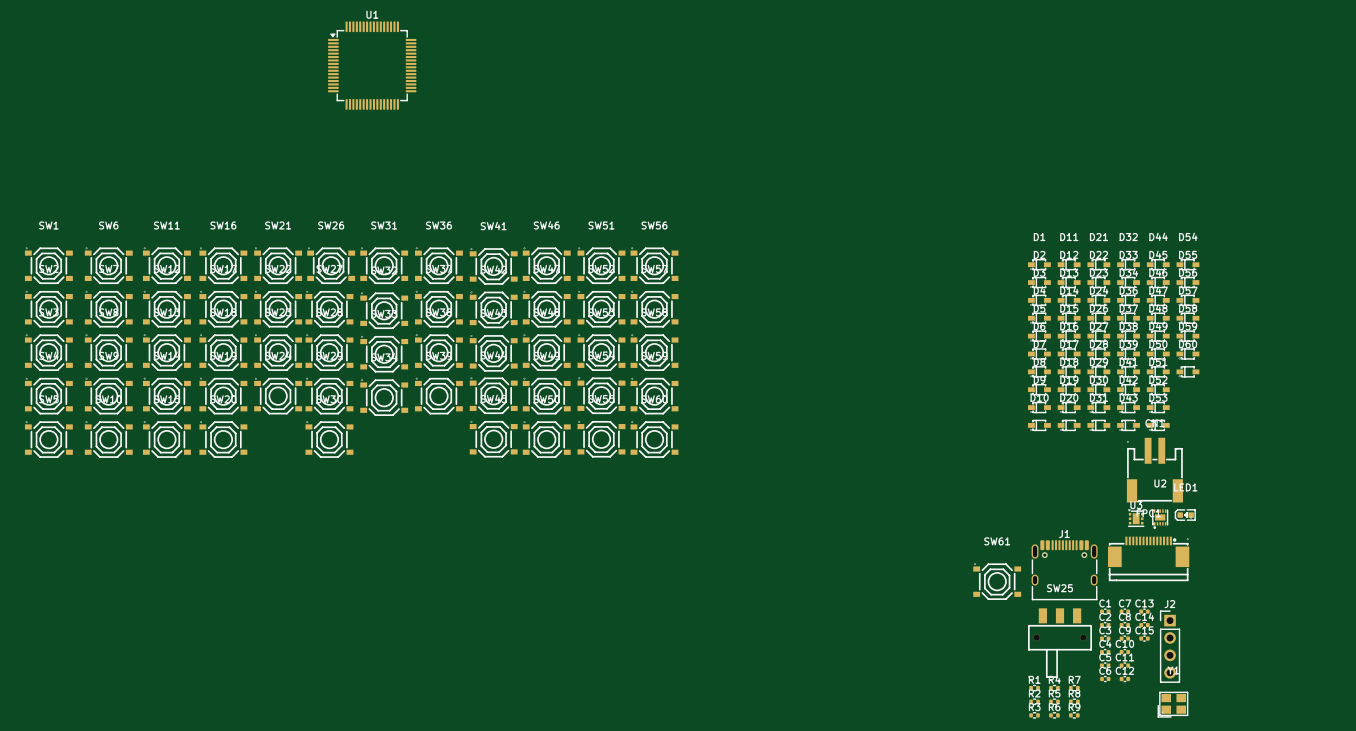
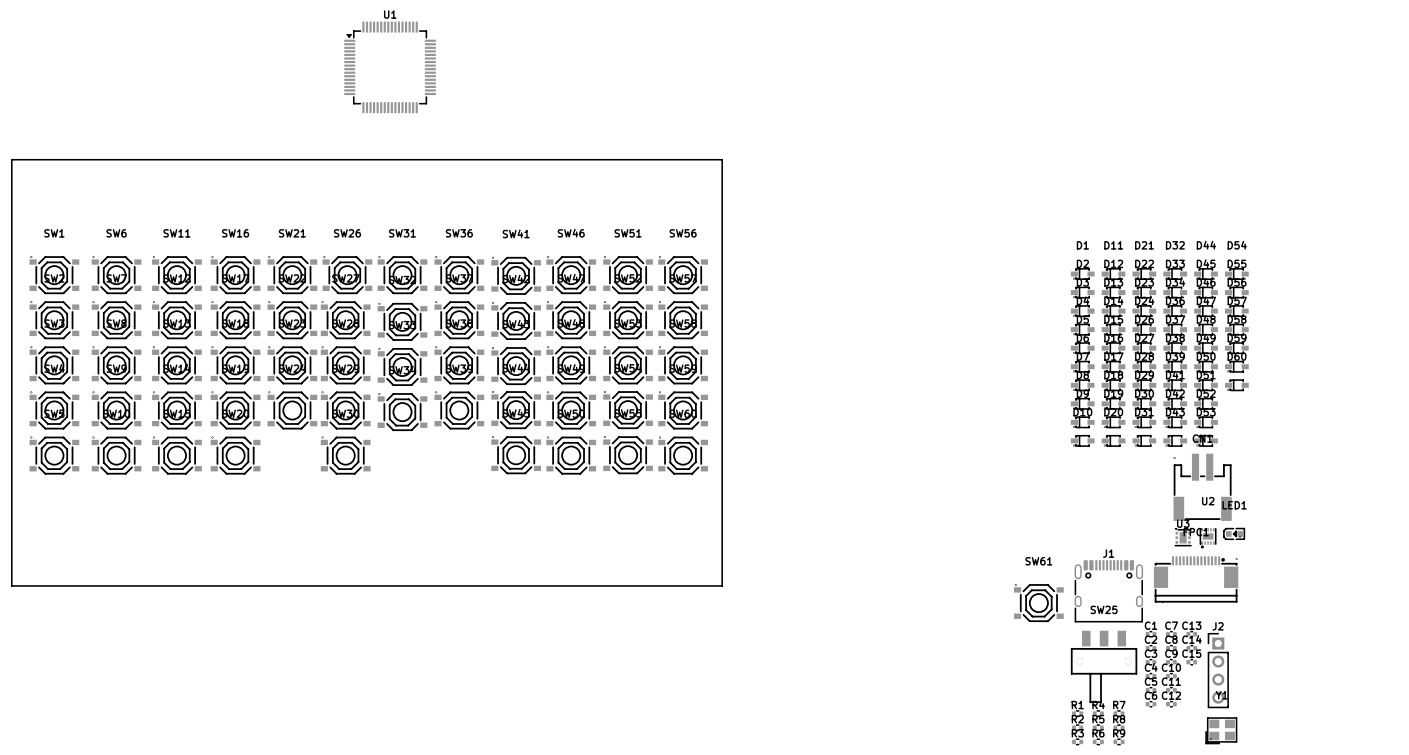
board edge: none -> (11, 159) (722, 159) (722, 585) (11, 585) (11, 159)

